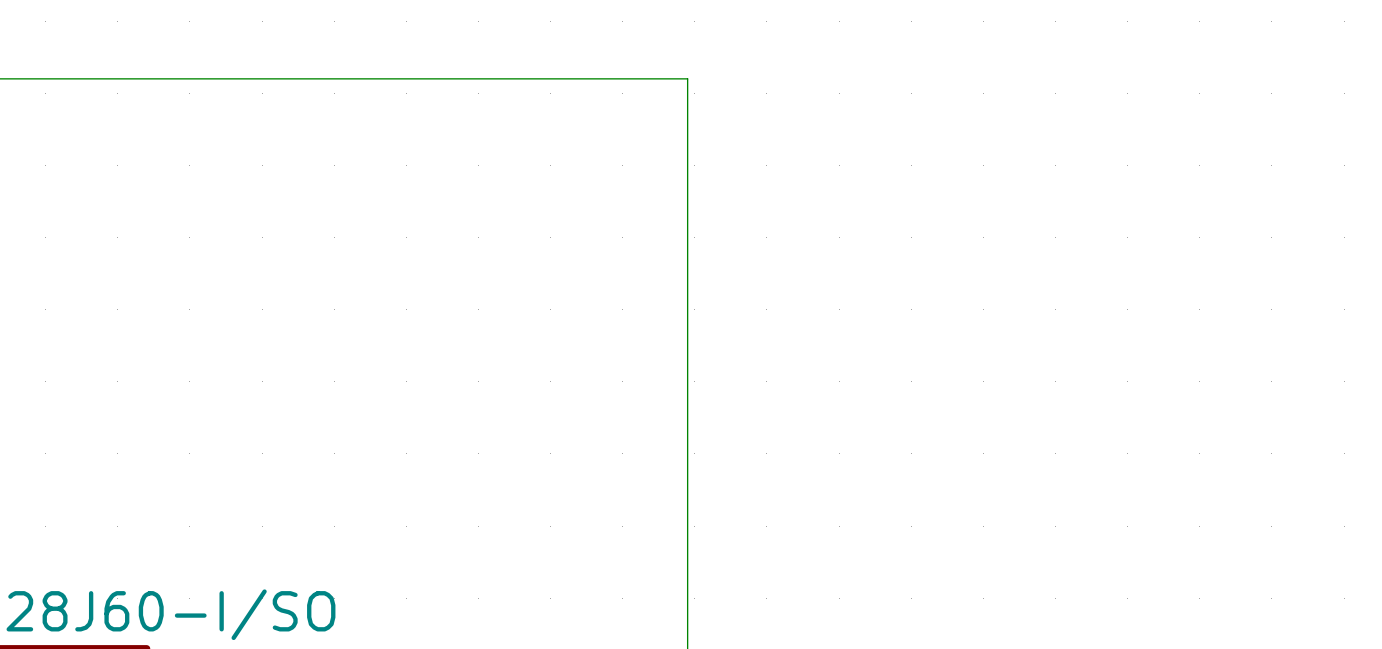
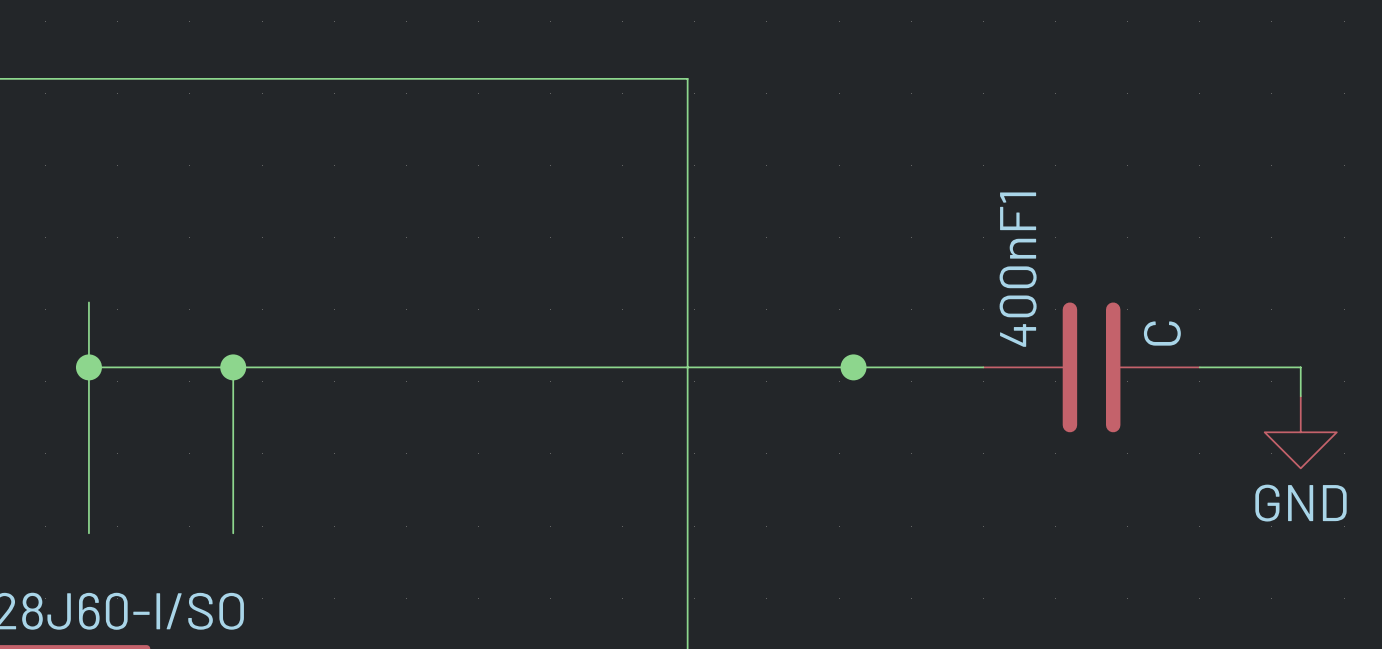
wire: none -> (88, 302) (88, 533)
wire: none -> (88, 367) (983, 367)
junction: none -> (88, 367)
wire: none -> (233, 367) (233, 533)
junction: none -> (233, 367)
junction: none -> (853, 367)
400nF1: none -> C (1091, 367)
wire: none -> (1199, 367) (1300, 367) (1300, 396)
power symbol: none -> GND (1300, 432)

